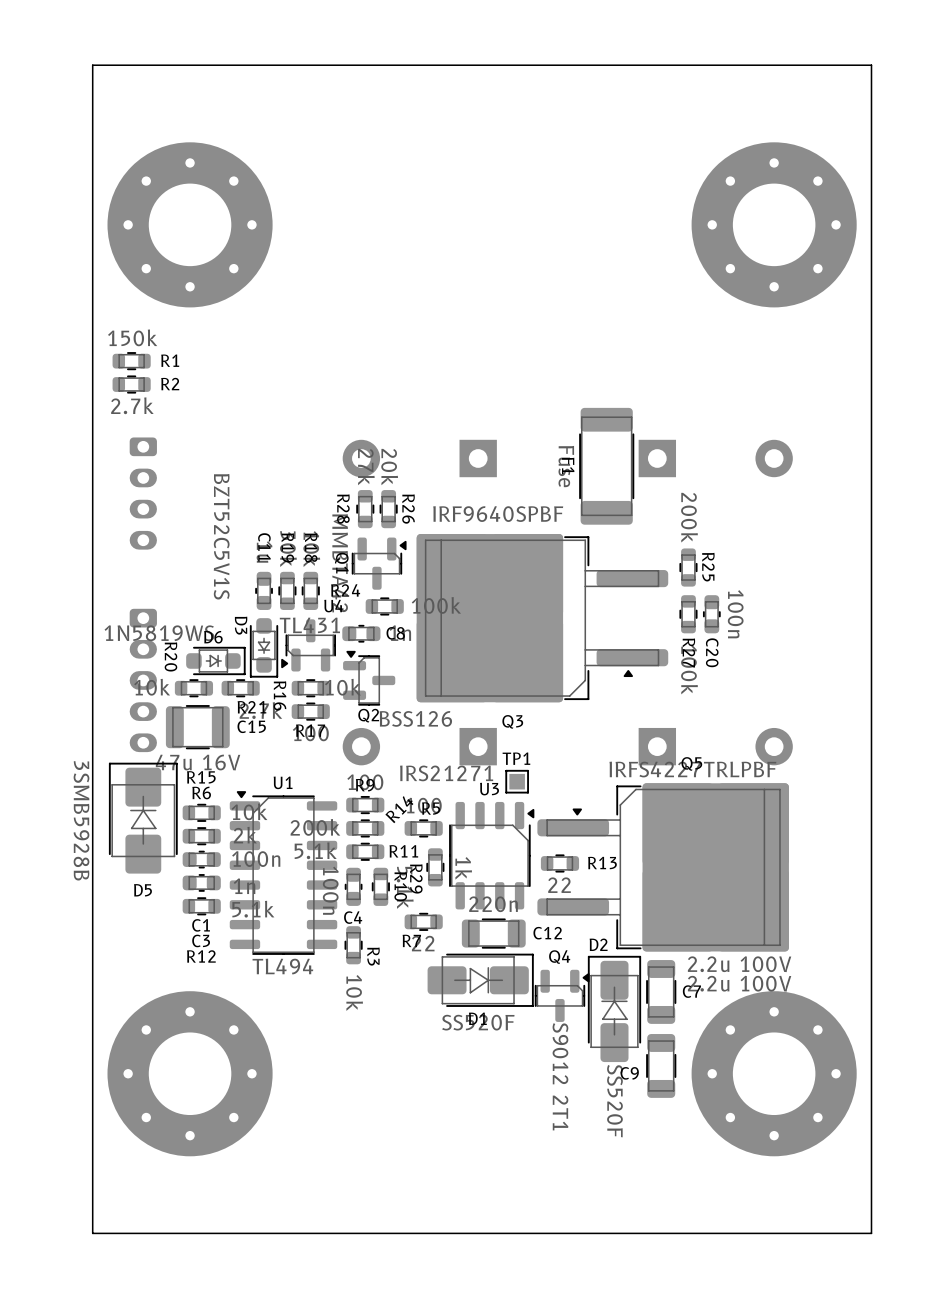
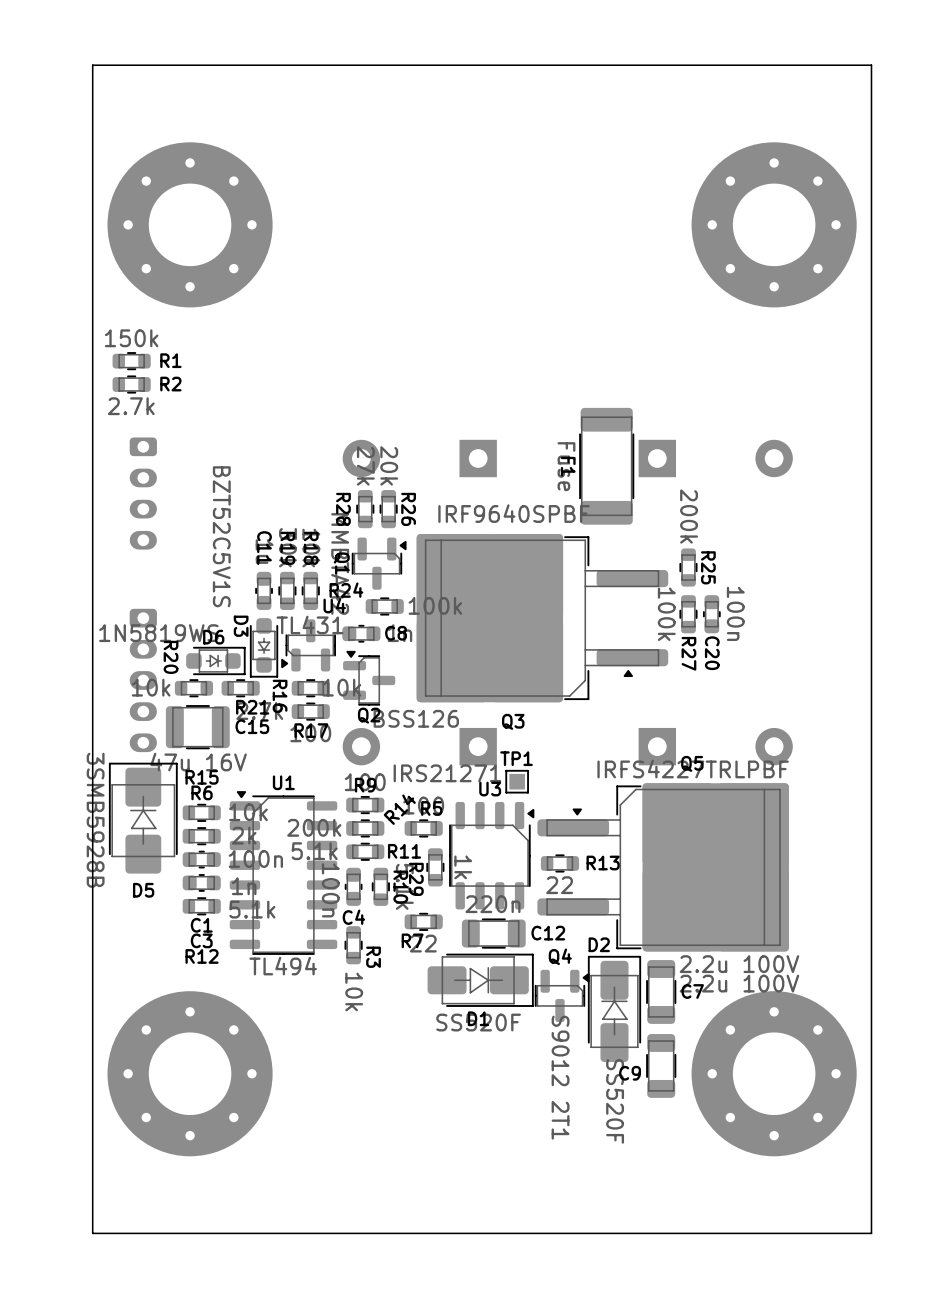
Q3 value position: IRF9640SPBF (498, 514) -> IRF9640SPBF (513, 513)
R27 value position: 100k (689, 669) -> 100k (666, 614)
D5 value position: 3SMB5928B (81, 820) -> 3SMB5928B (95, 820)

